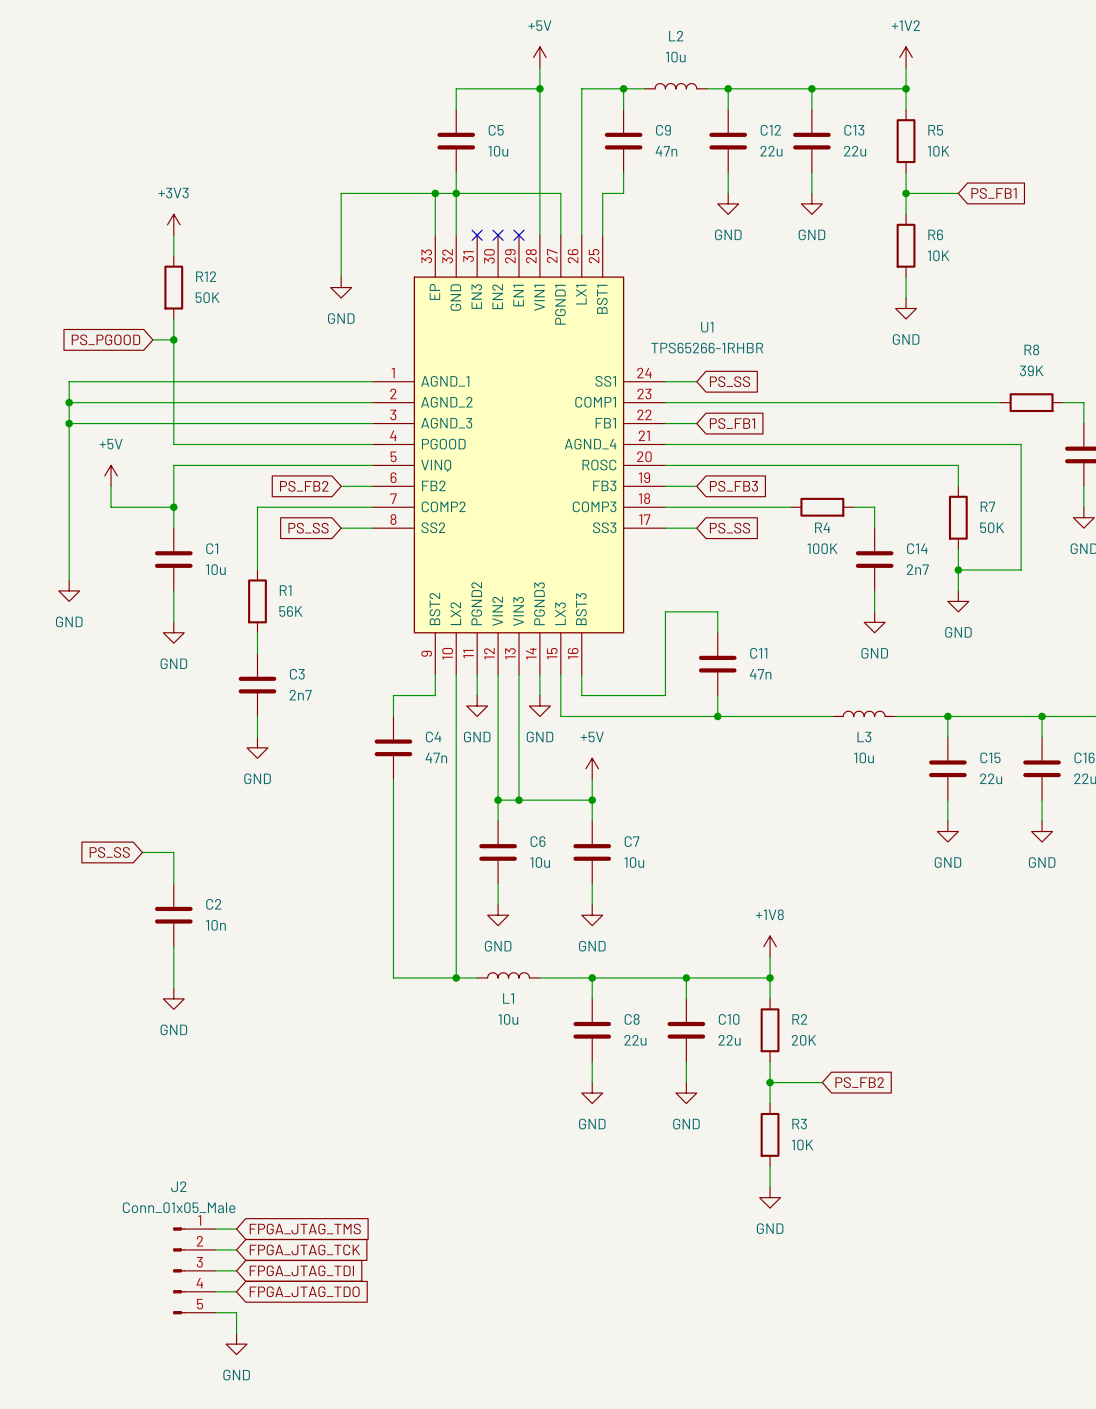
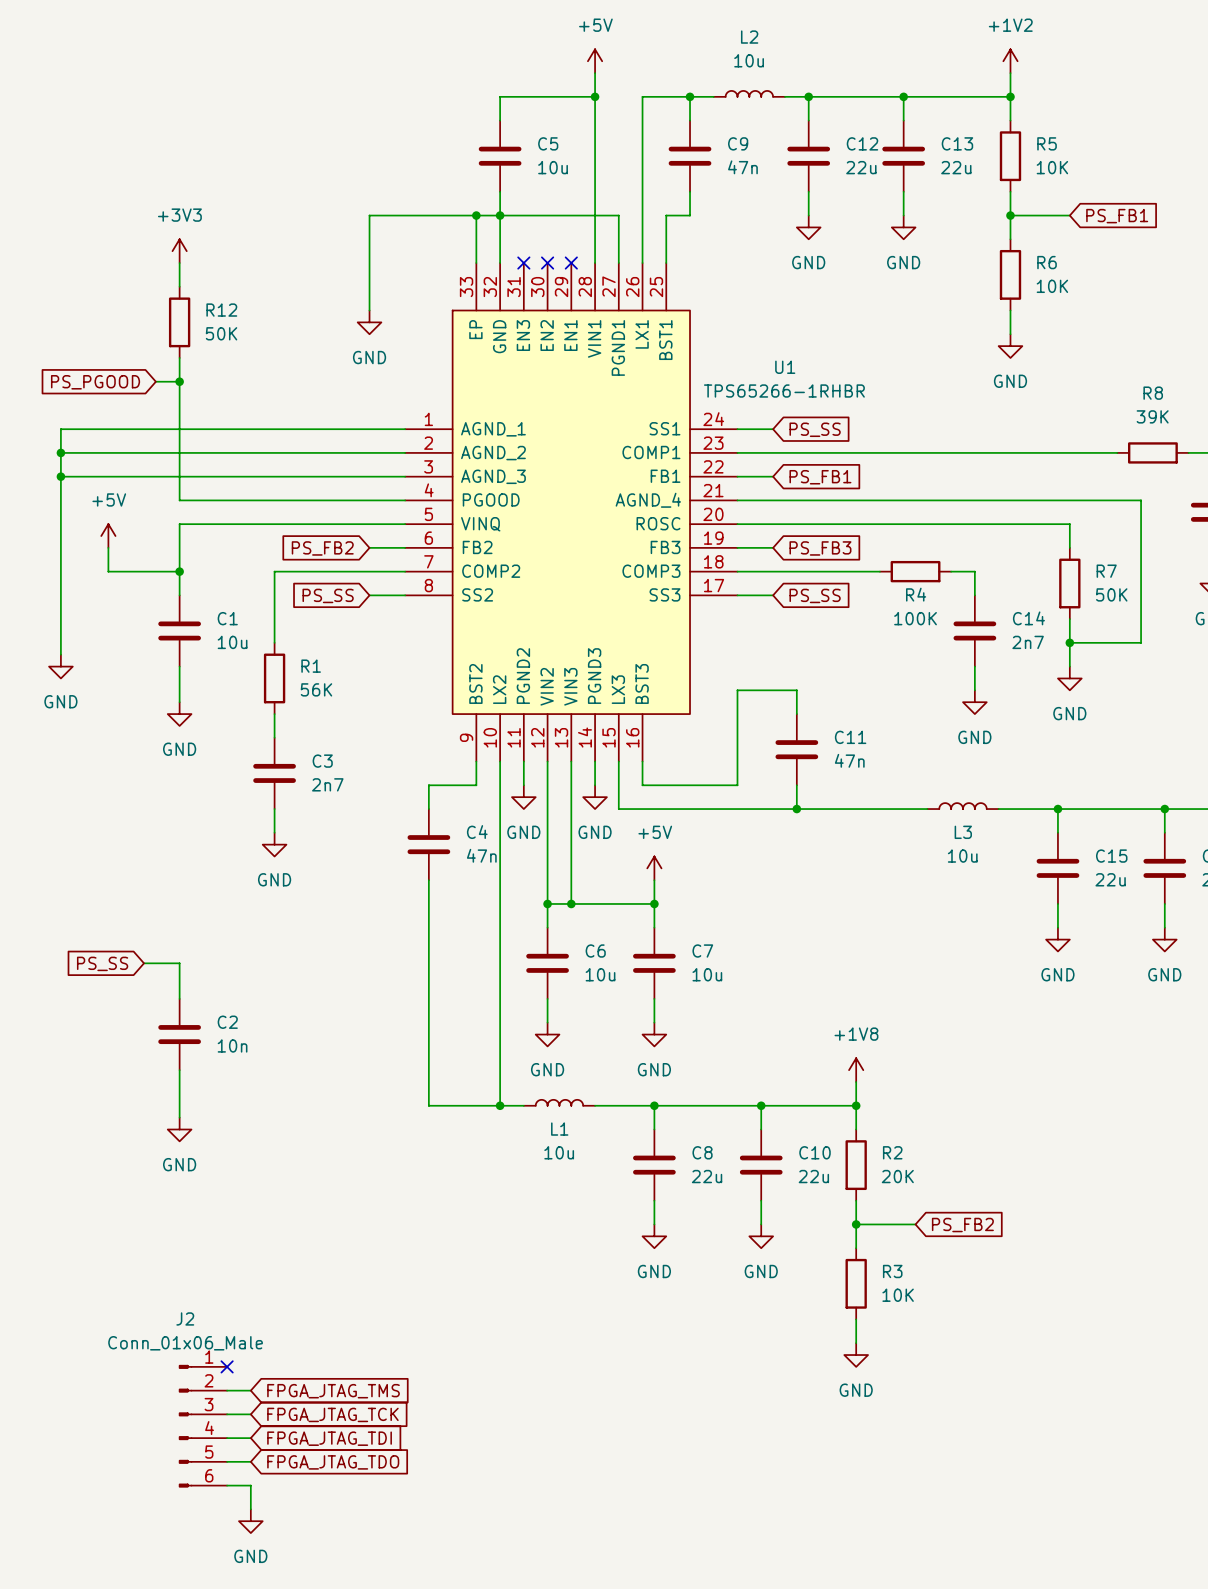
J2 value: Conn_01x05_Male (179, 1207) -> Conn_01x06_Male (185, 1343)
no-connect mark: none -> (227, 1366)
J2 symbol: [173, 1227, 216, 1315] -> [178, 1364, 228, 1488]

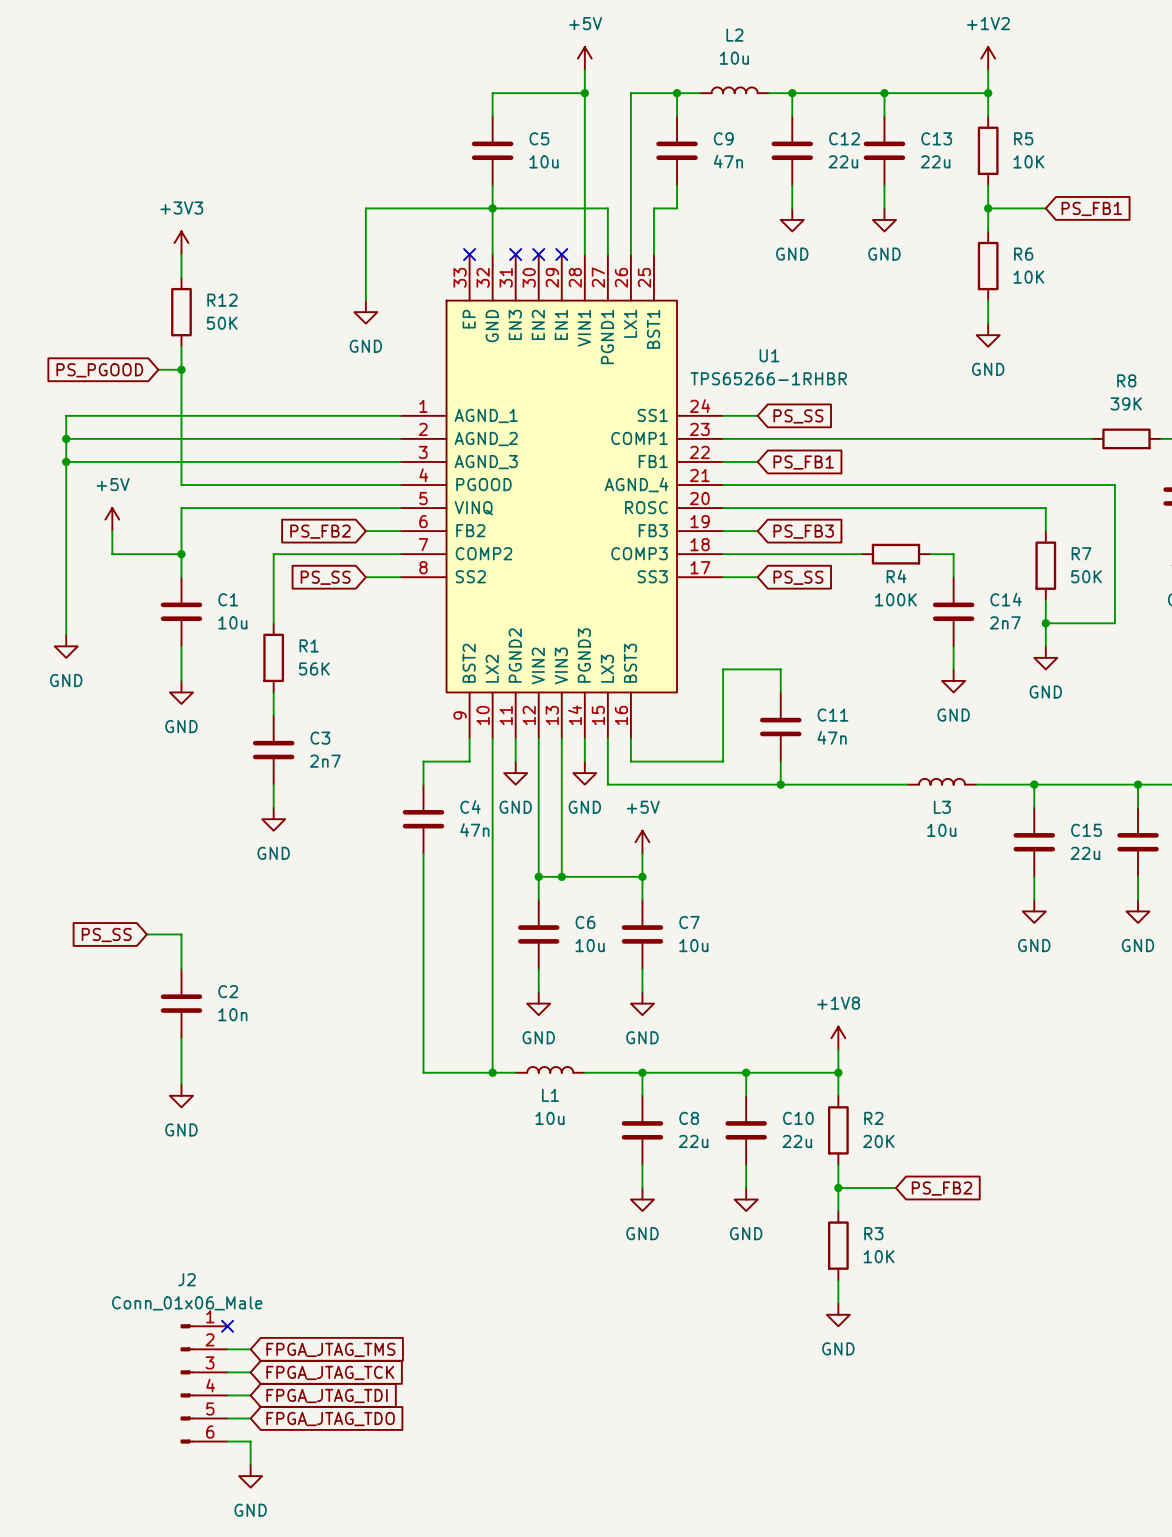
wire: (476, 215) (476, 263) -> none
junction: (476, 215) -> none
no-connect mark: none -> (469, 254)

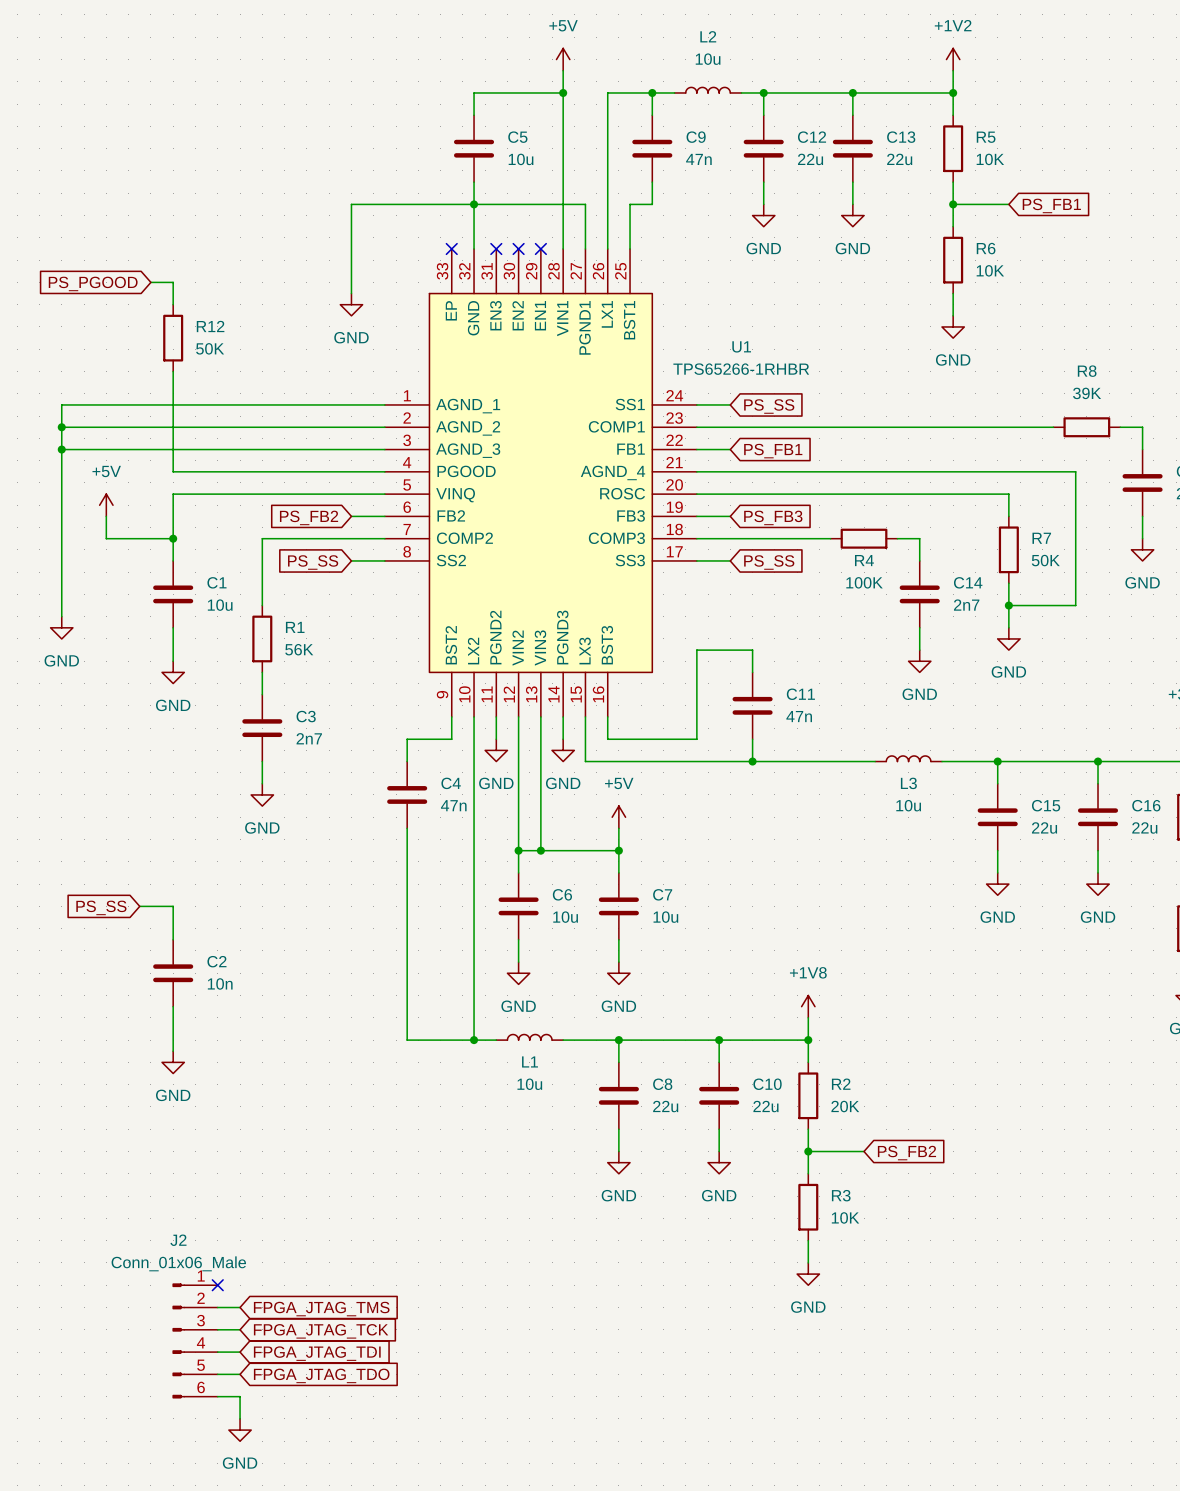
power symbol: +3V3 (181, 242) -> none
wire: (181, 254) (181, 277) -> none
wire: none -> (150, 282) (173, 282) (173, 304)
R12 position: (181, 312) -> (173, 338)
wire: (181, 346) (181, 381) -> none
wire: (158, 369) (181, 369) -> none
junction: (181, 369) -> none
global label position: PS_PGOOD (99, 370) -> PS_PGOOD (93, 283)

